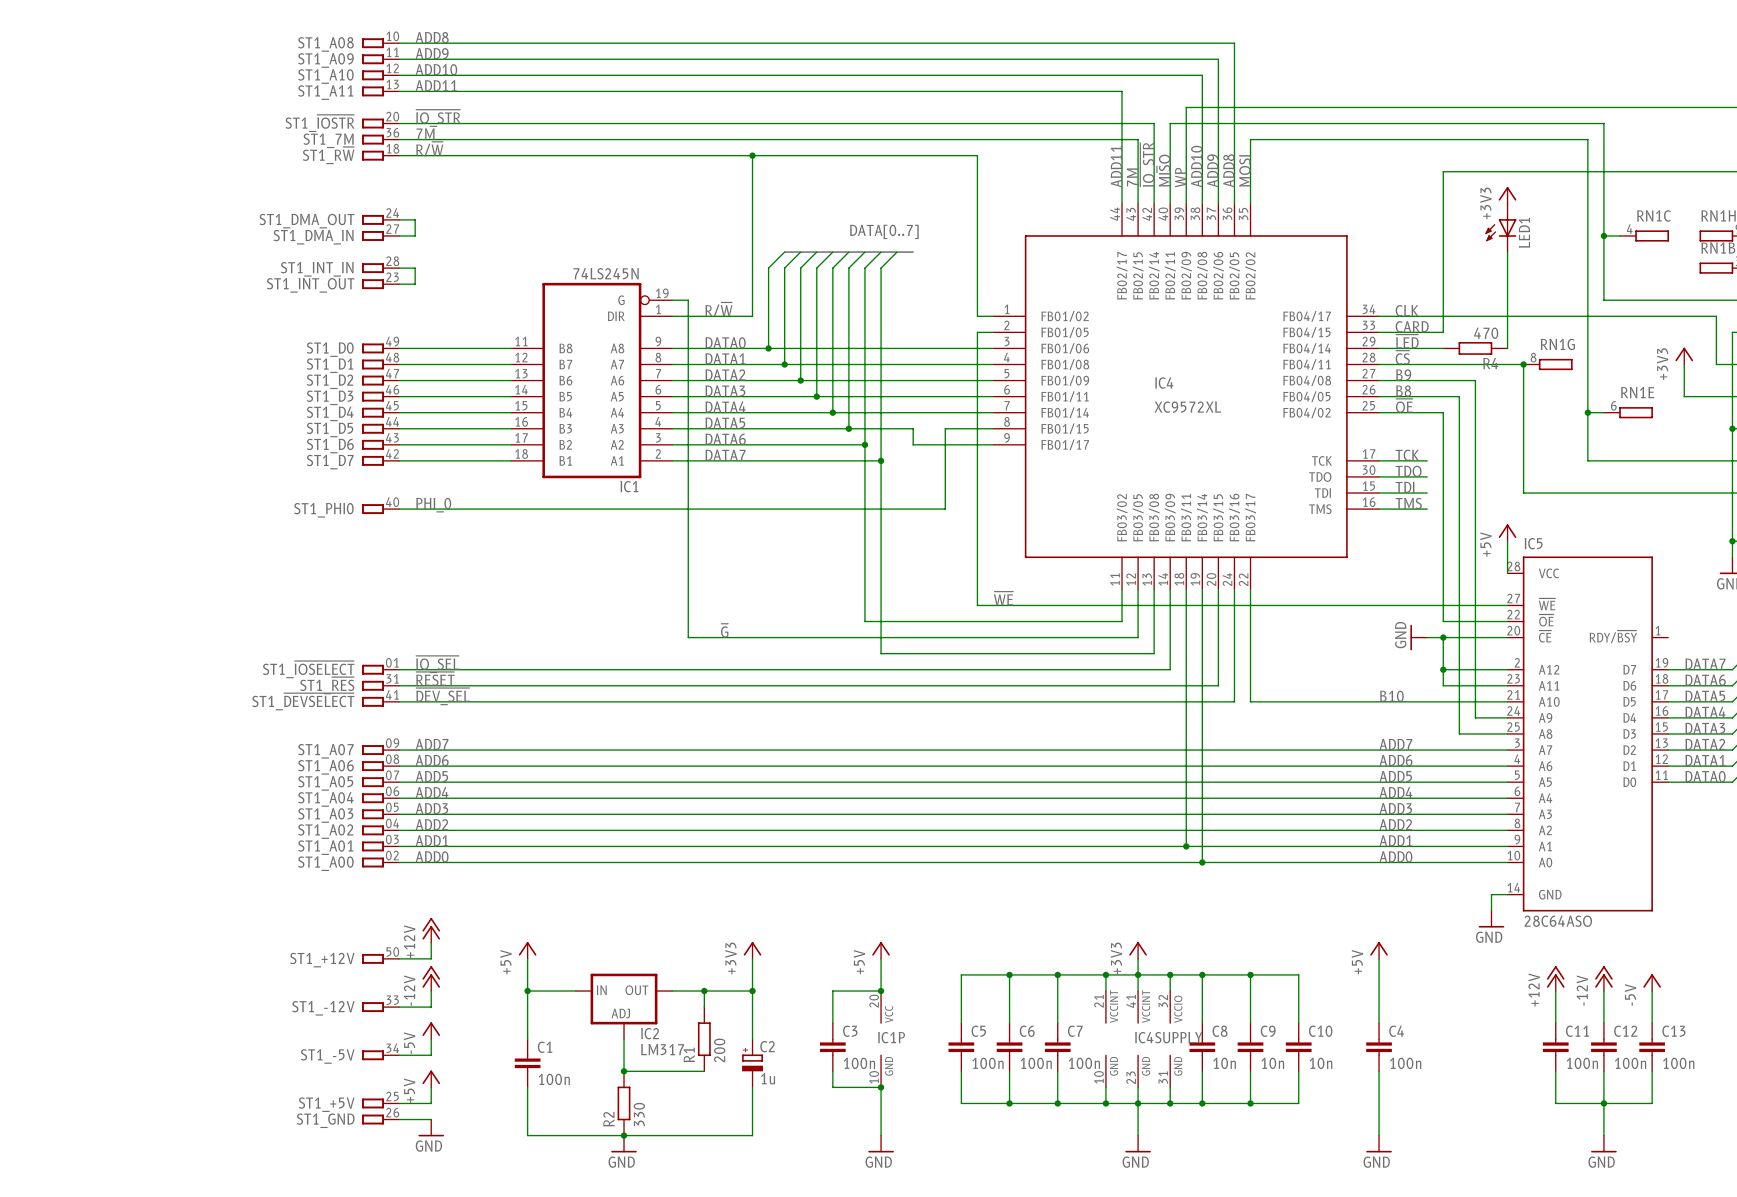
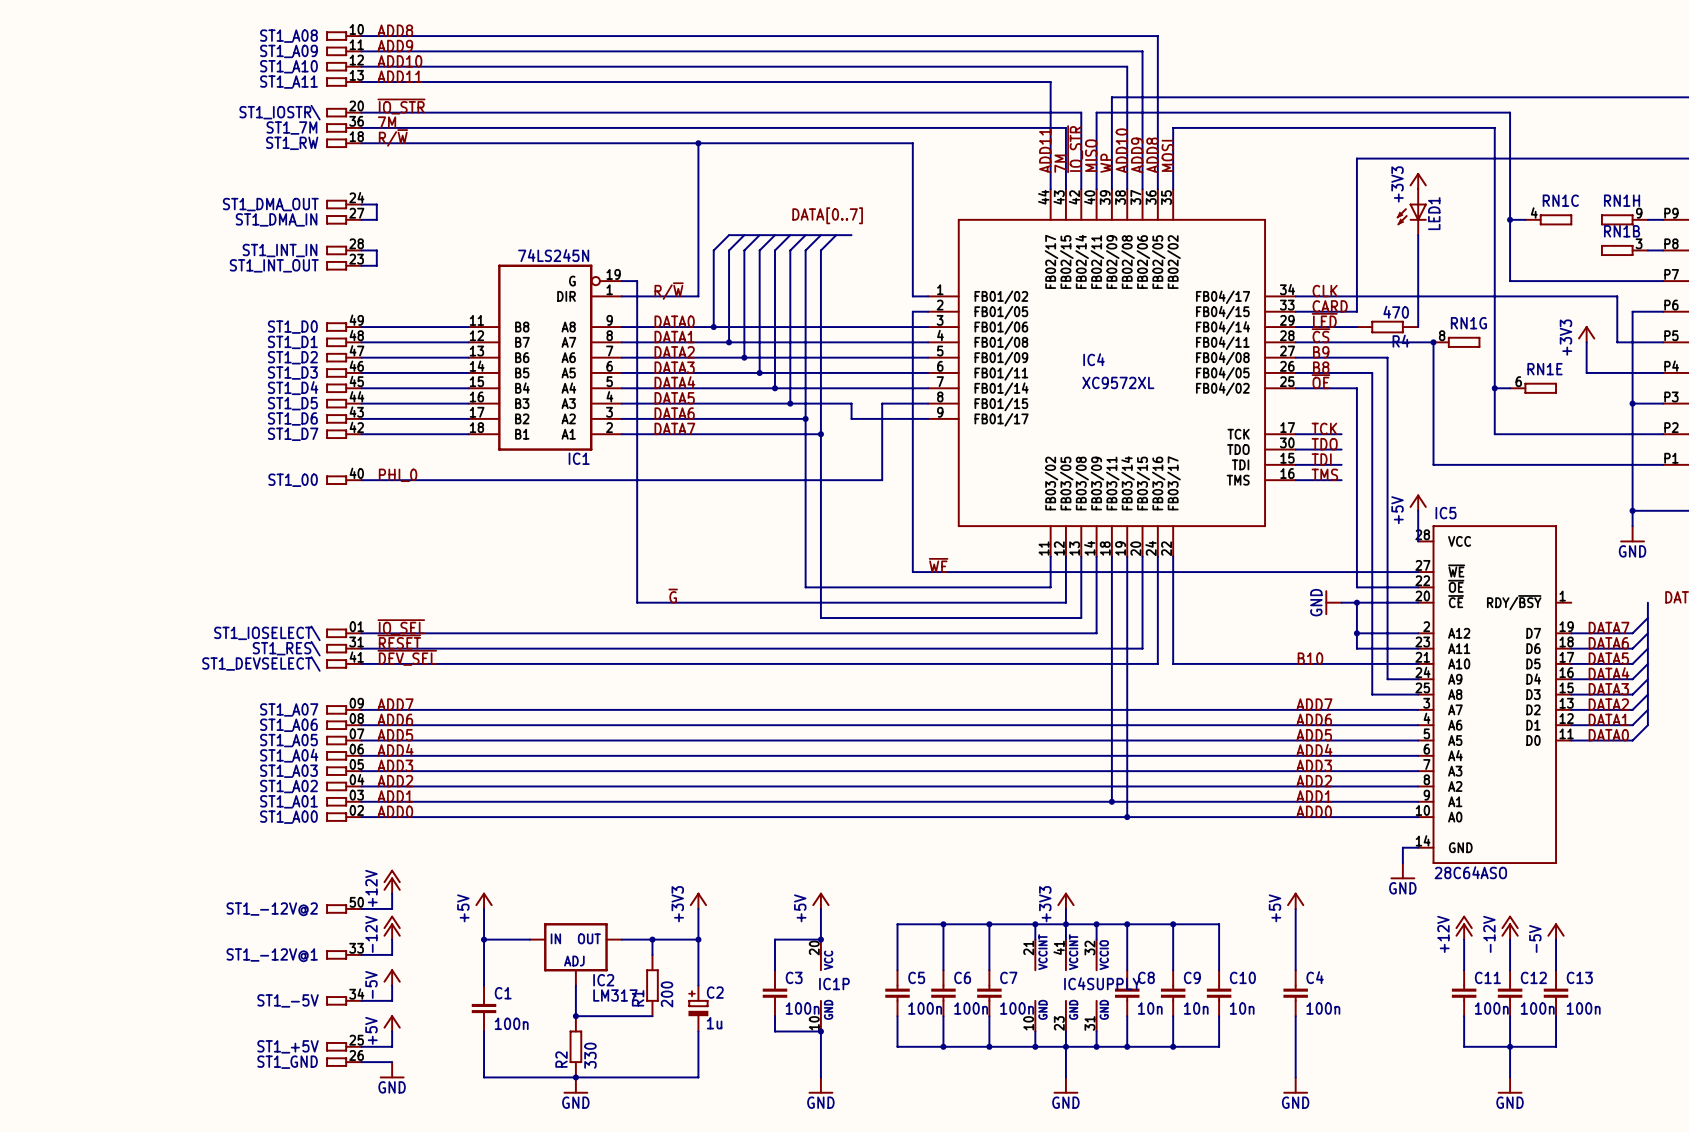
ST1_~{IOSTR} name: ST1_~{IOSTR} (320, 123) -> ST1_IOSTR\ (280, 112)
ST1_R~{W} name: ST1_R~{W} (328, 155) -> ST1_RW (292, 143)
ST1_PHI0 name: ST1_PHI0 (323, 510) -> ST1_00 (293, 480)
ST1_~{IOSELECT} name: ST1_~{IOSELECT} (308, 669) -> ST1_IOSELECT\ (267, 633)
ST1_~{RES} name: ST1_~{RES} (327, 685) -> ST1_RES\ (286, 648)
ST1_~{DEVSELECT} name: ST1_~{DEVSELECT} (303, 701) -> ST1_DEVSELECT\ (261, 664)
ST1_+12V name: ST1_+12V (322, 960) -> ST1_-12V@2 (272, 909)
ST1_-12V name: ST1_-12V (323, 1008) -> ST1_-12V@1 (272, 955)

